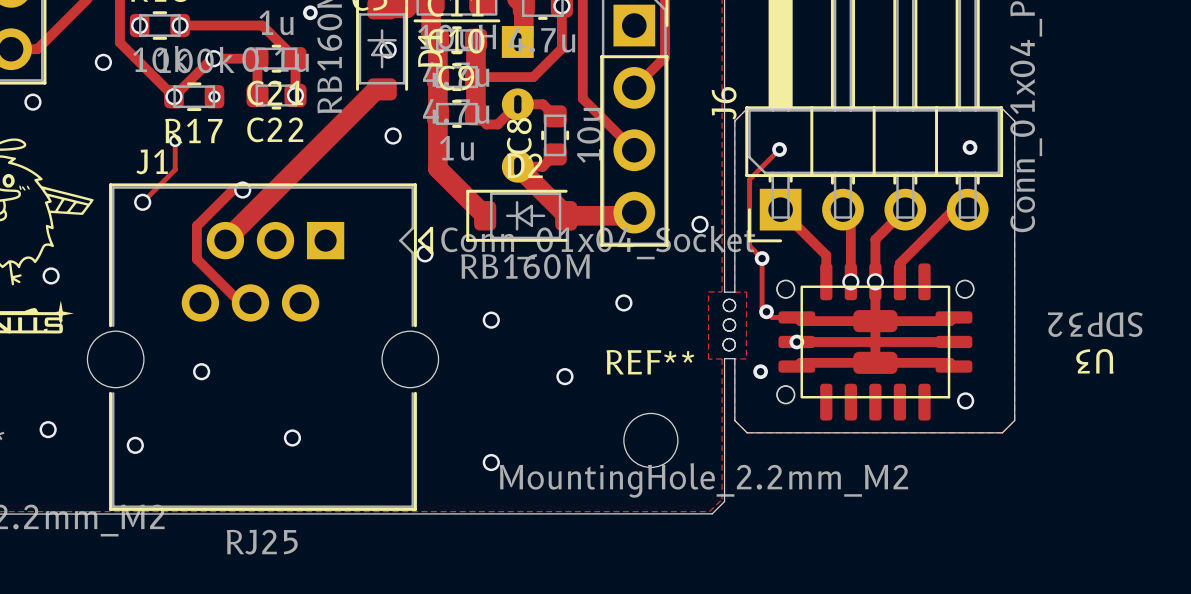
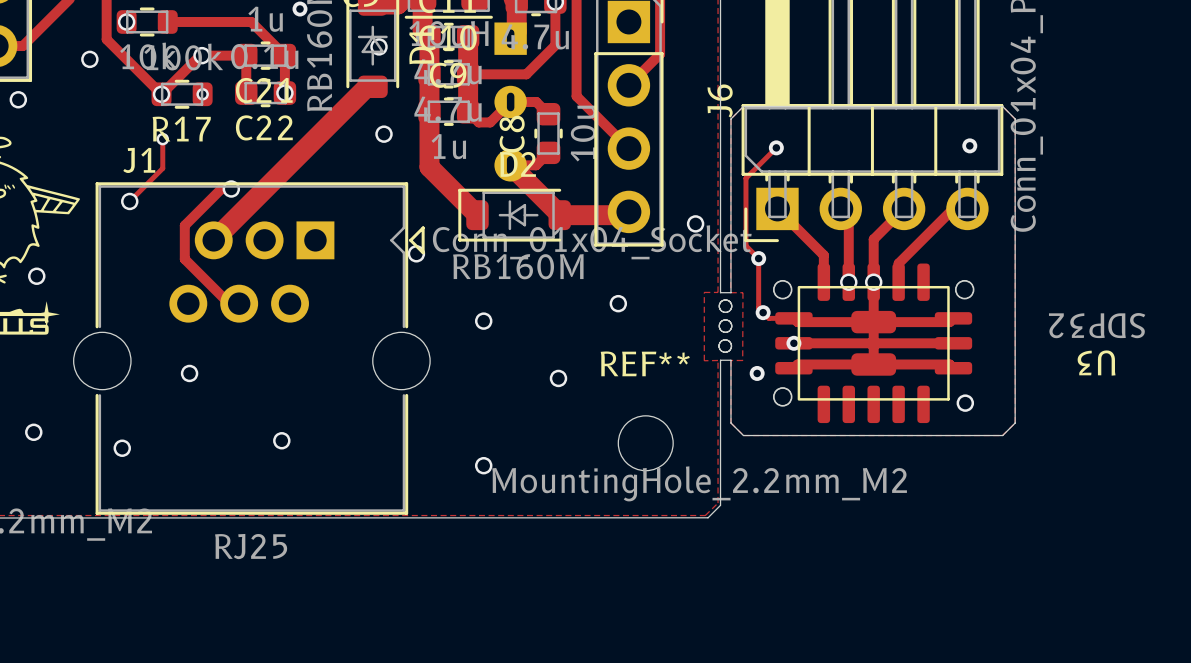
via: (180, 25) -> none

